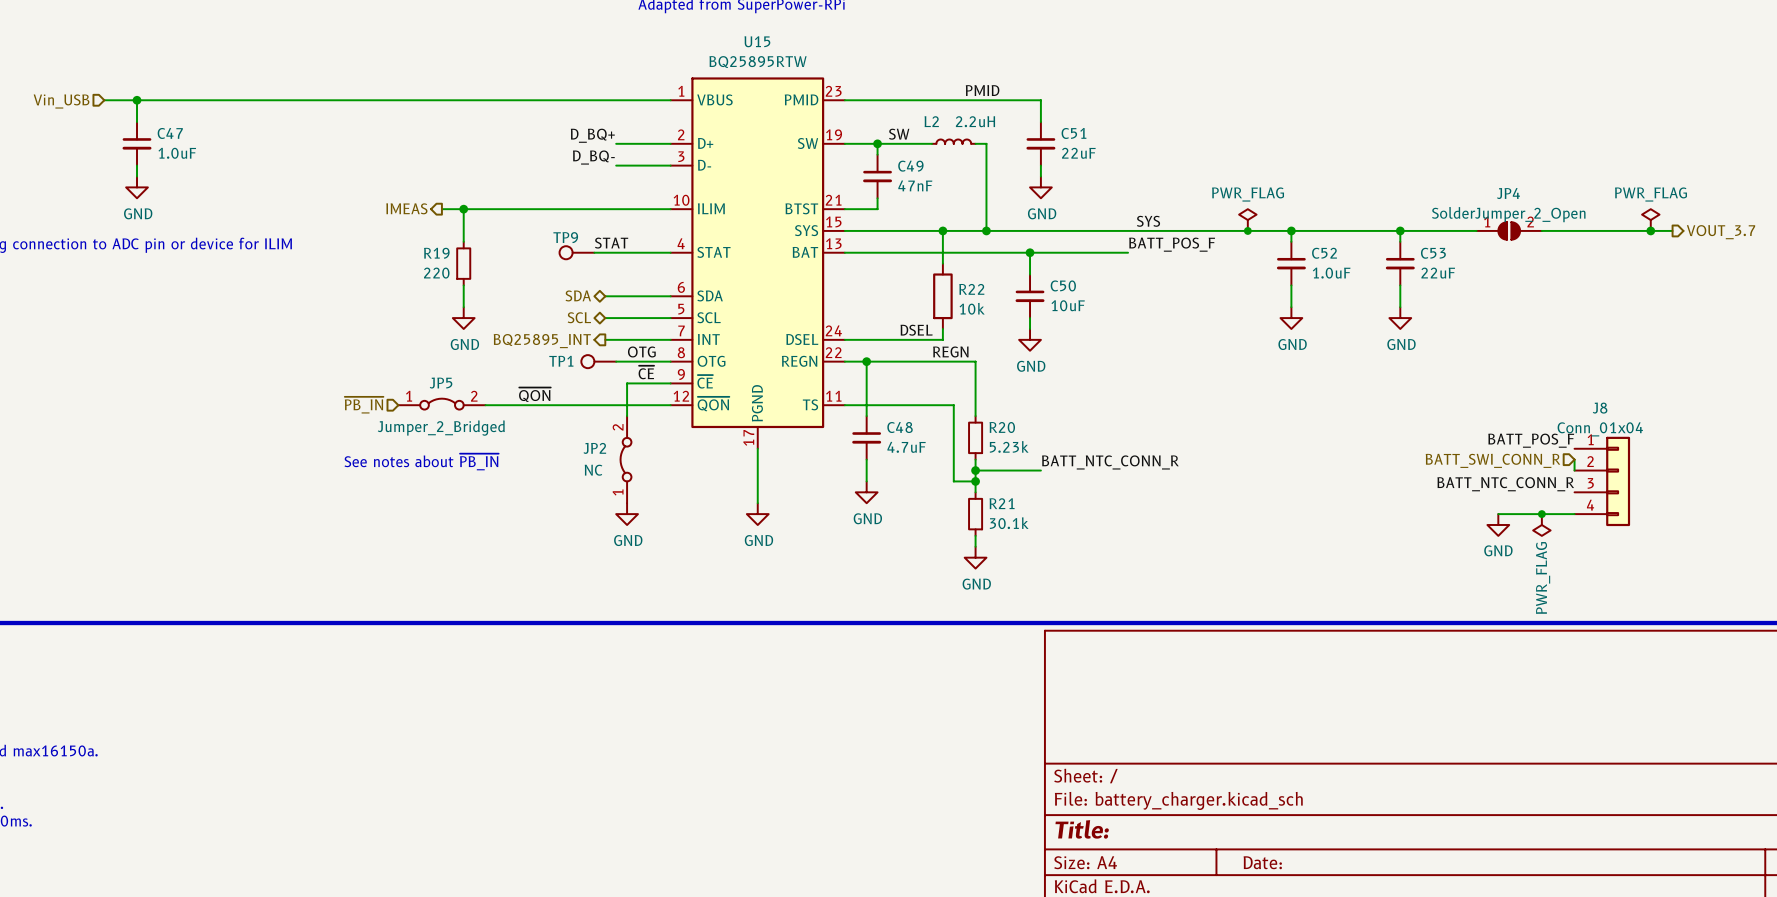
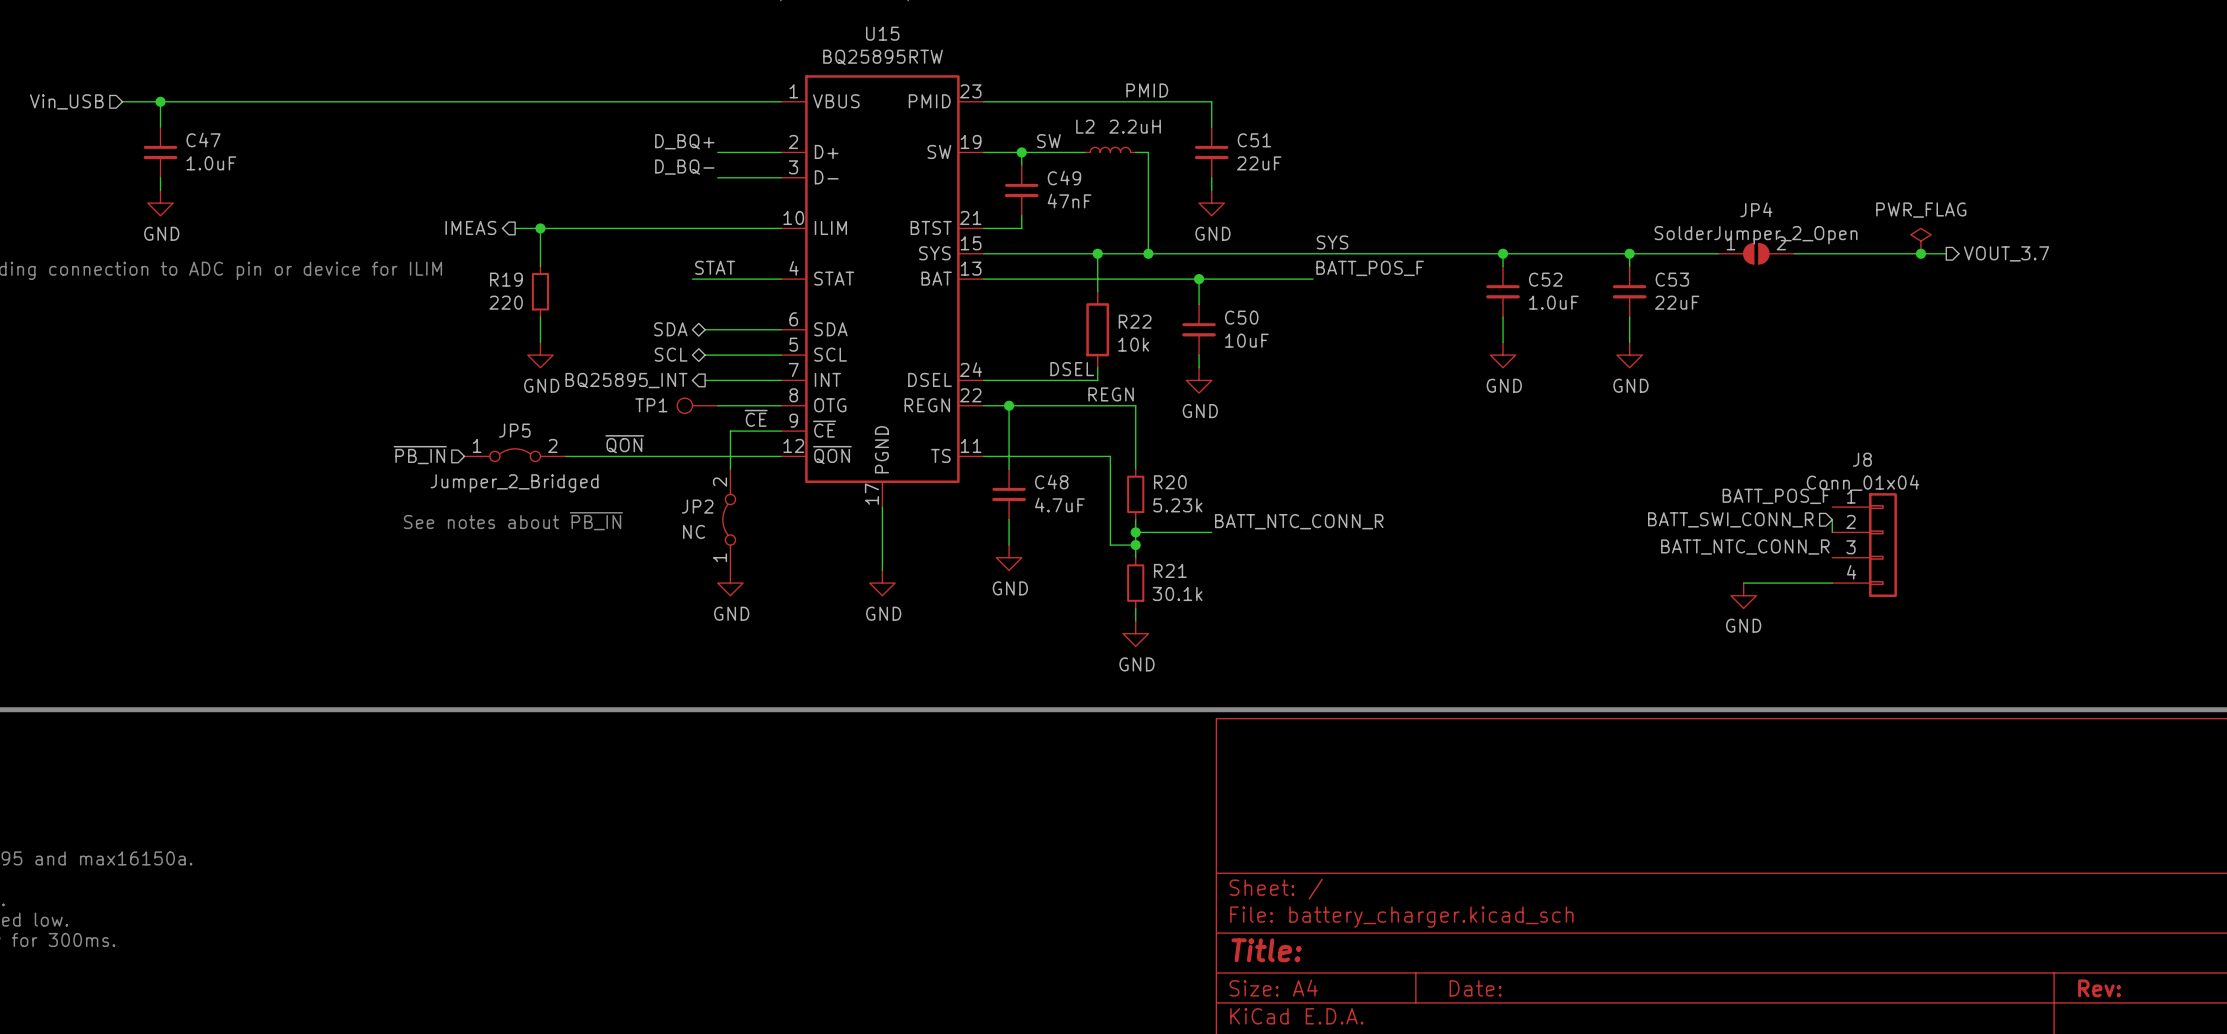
power symbol: PWR_FLAG (1247, 220) -> none
junction: (1247, 230) -> none
TP9: (576, 252) -> none
label: OTG (641, 351) -> none
junction: (1541, 514) -> none
power symbol: PWR_FLAG (1541, 524) -> none

